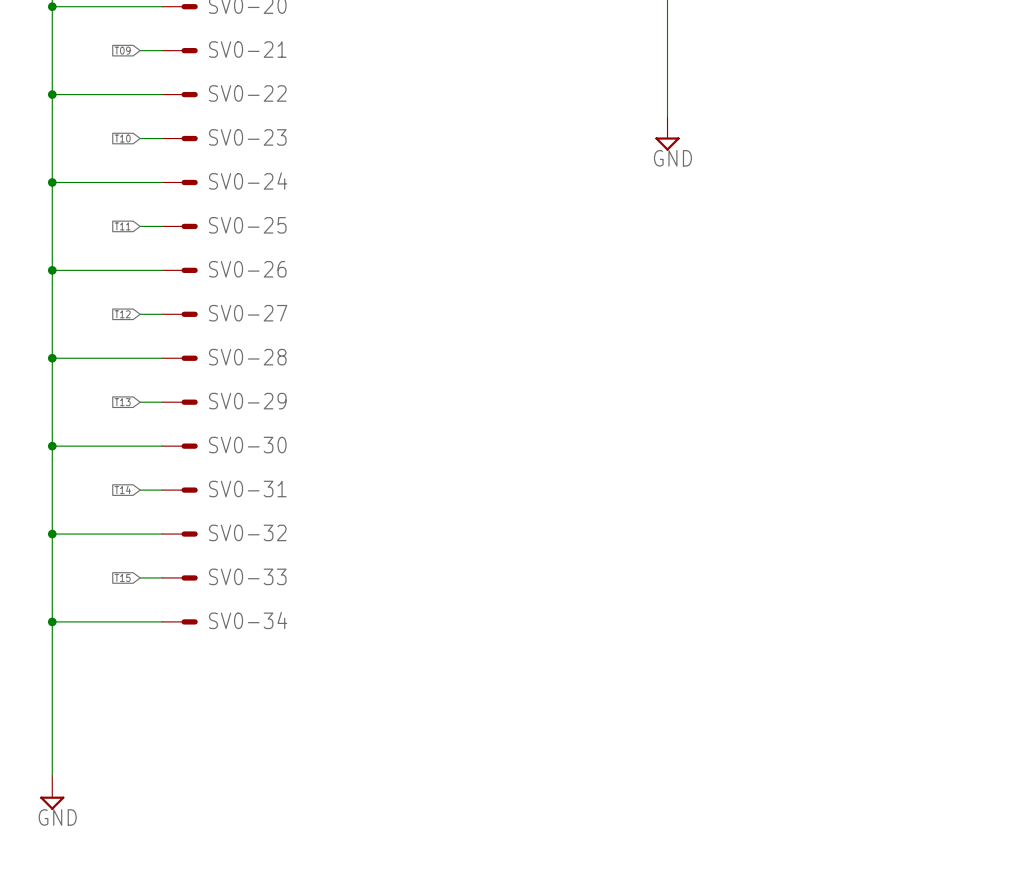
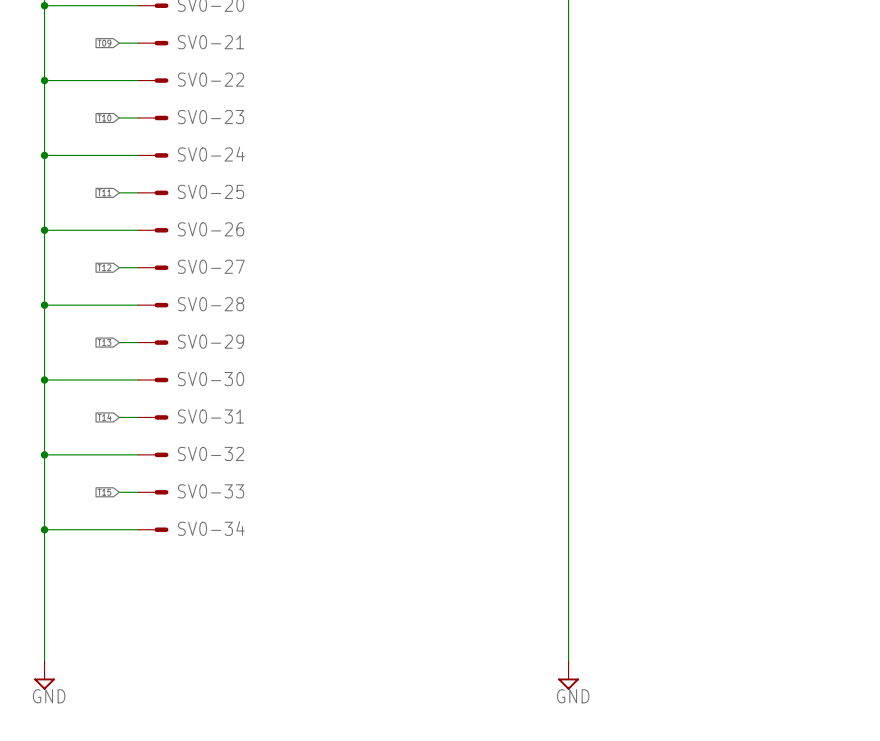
wire: none -> (568, 99) (568, 660)
power symbol: GND (667, 133) -> none
power symbol: none -> GND (568, 675)

